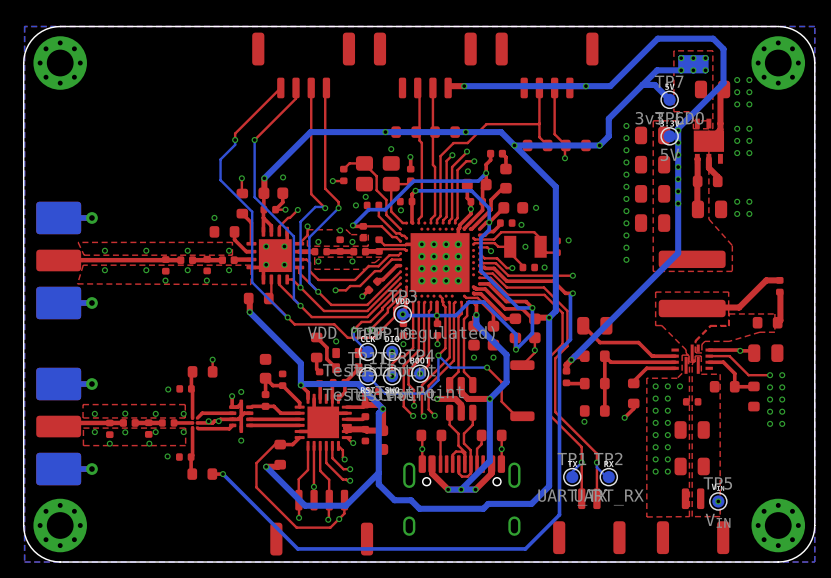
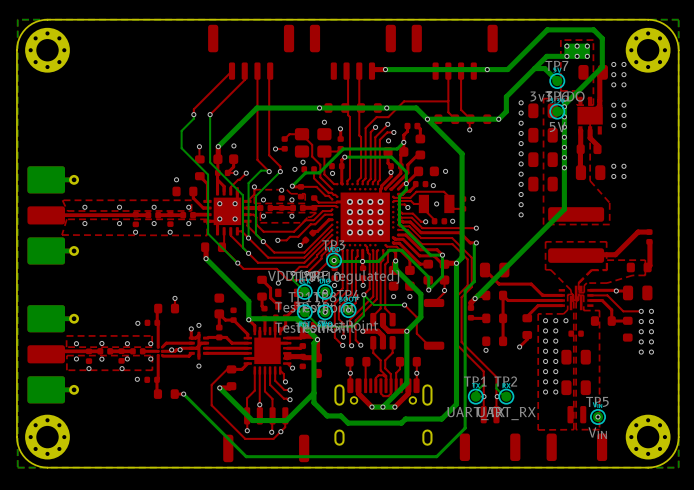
via: (581, 462) -> none
via: (596, 462) -> none
via: none -> (483, 396)
via: none -> (497, 396)

